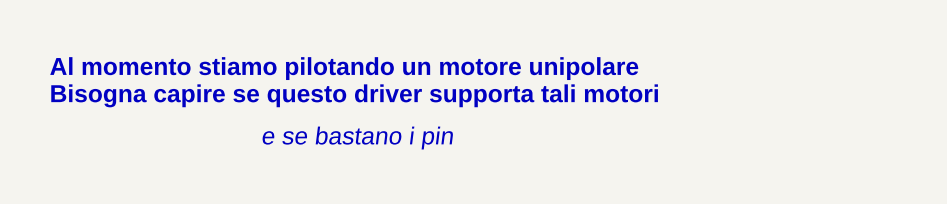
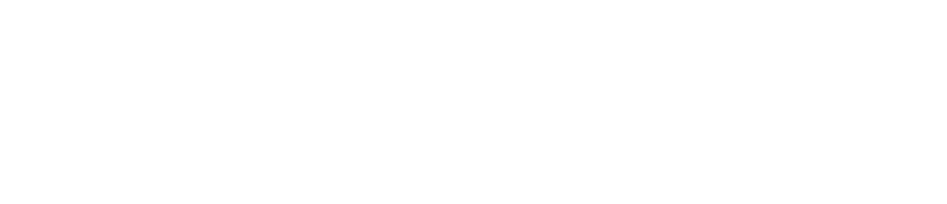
text: Al momento stiamo pilotando un motore unipolare (344, 68) -> none
text: Bisogna capire se questo driver supporta tali motori (354, 95) -> none
text: e se bastano i pin (357, 138) -> none

